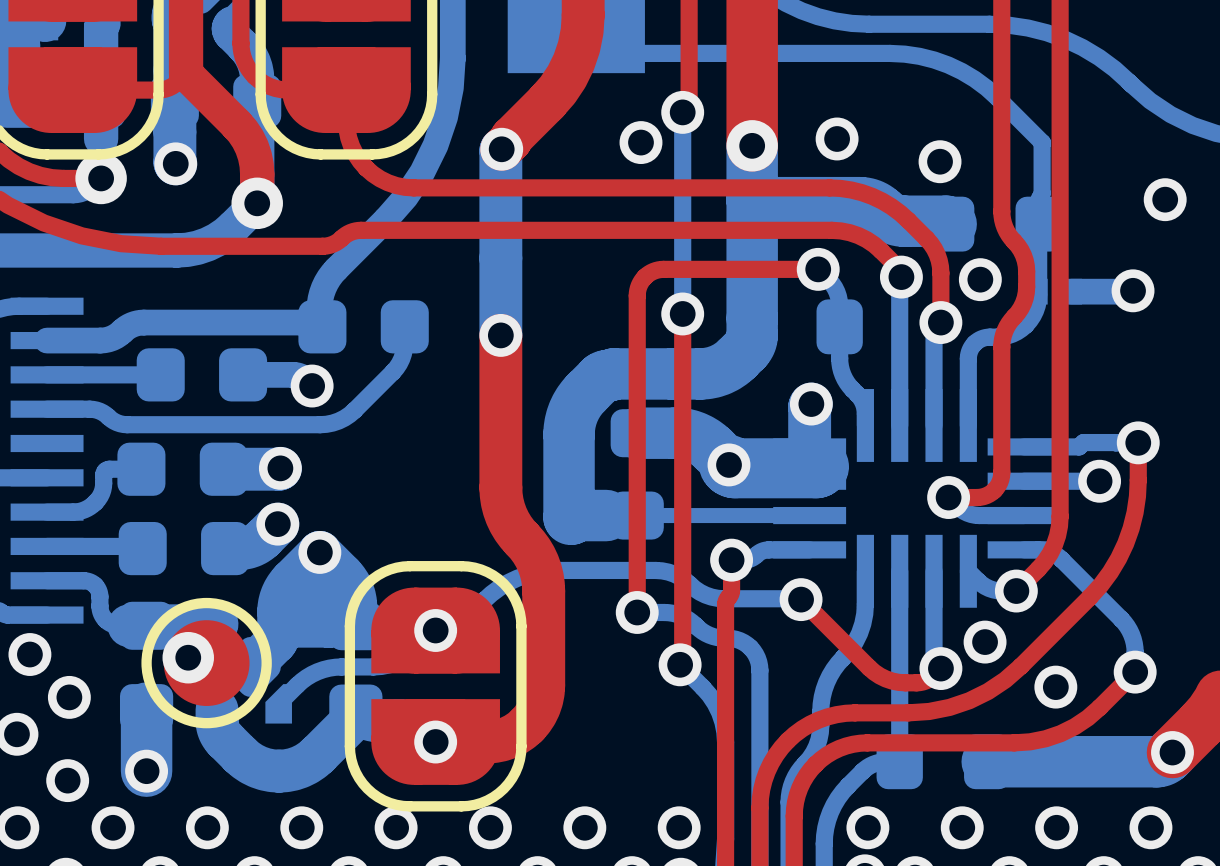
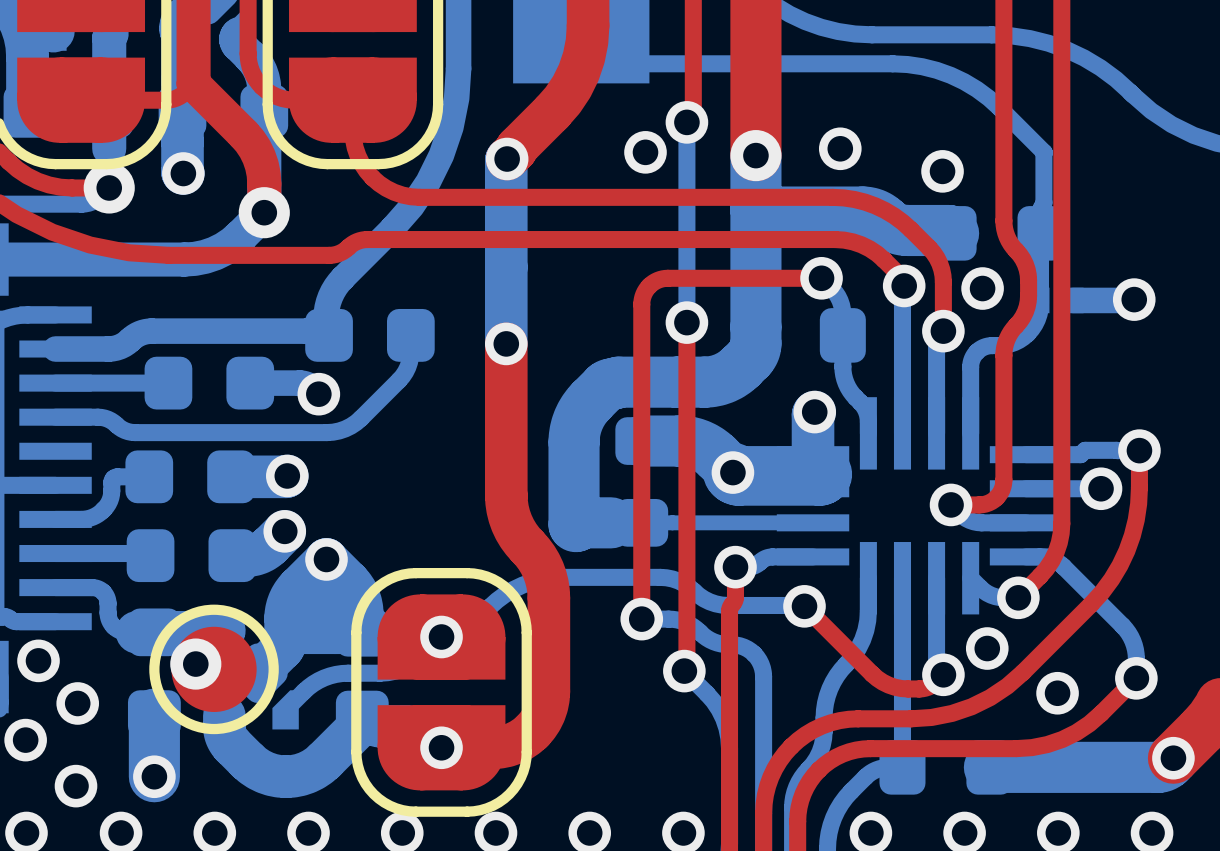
via: (1165, 199) -> none

